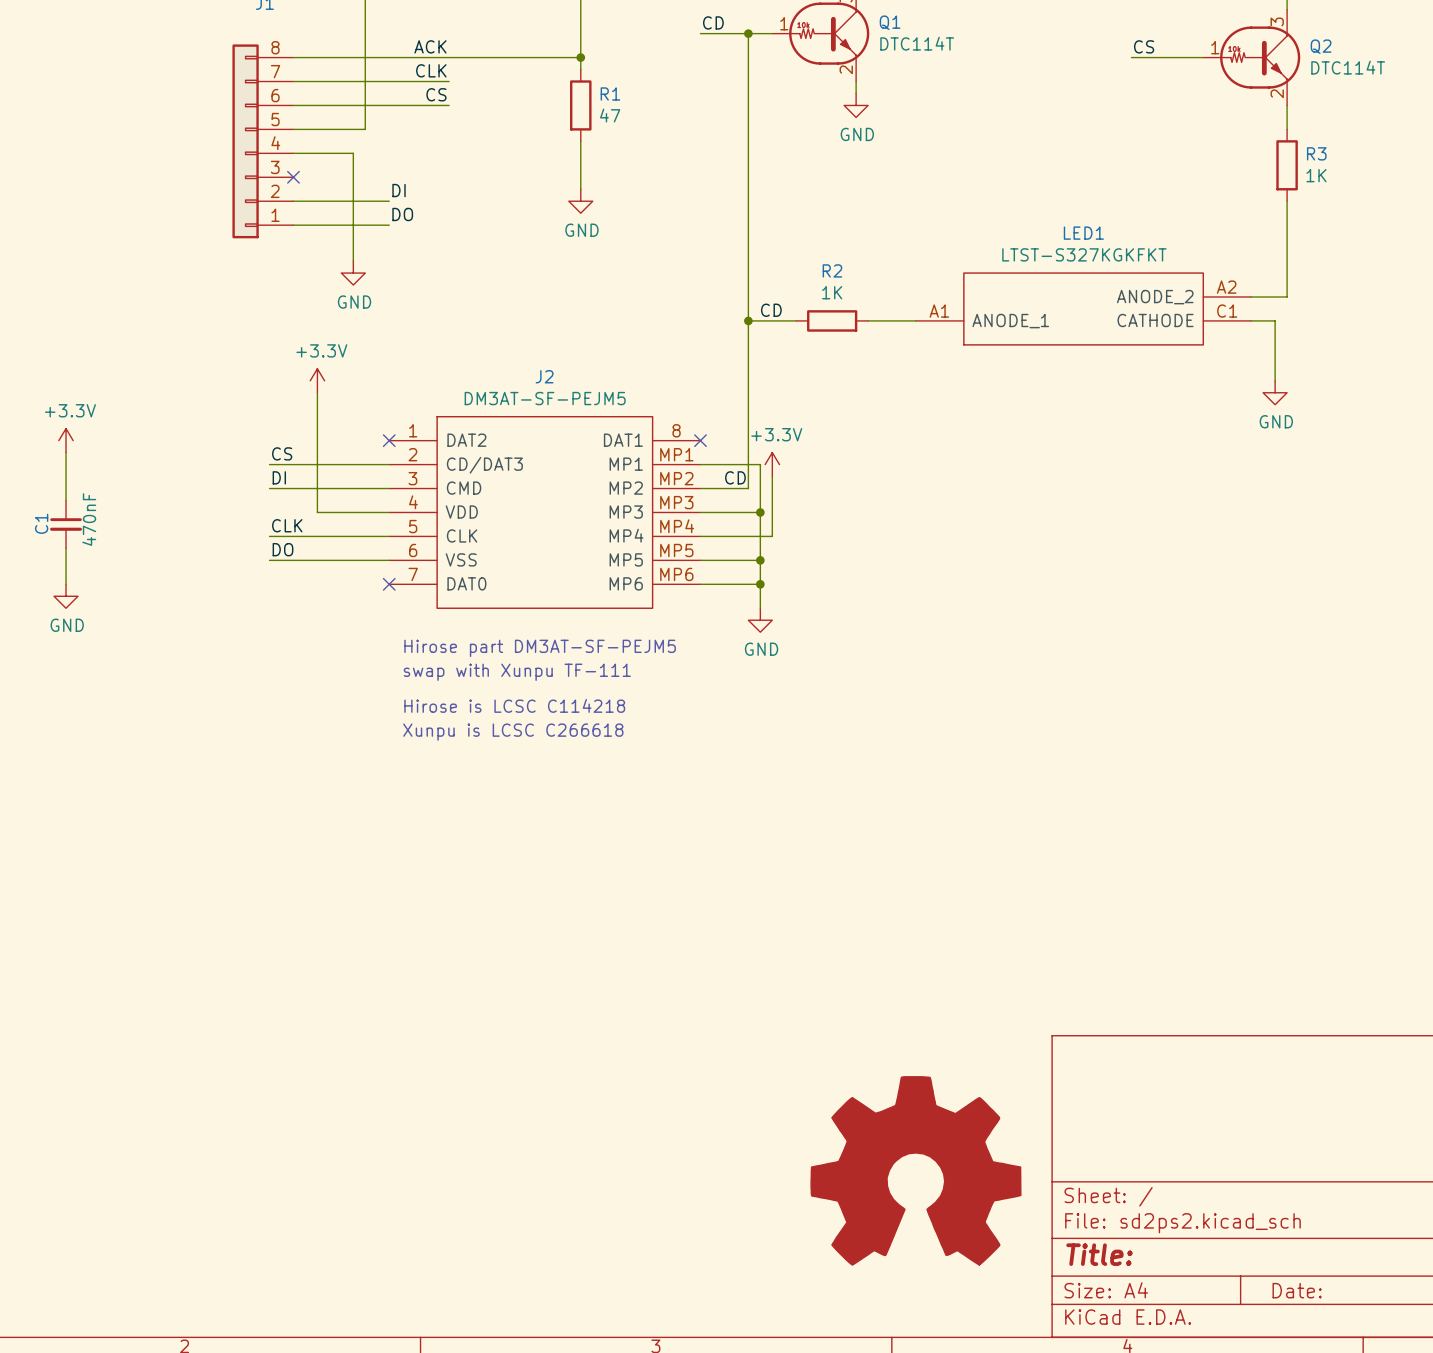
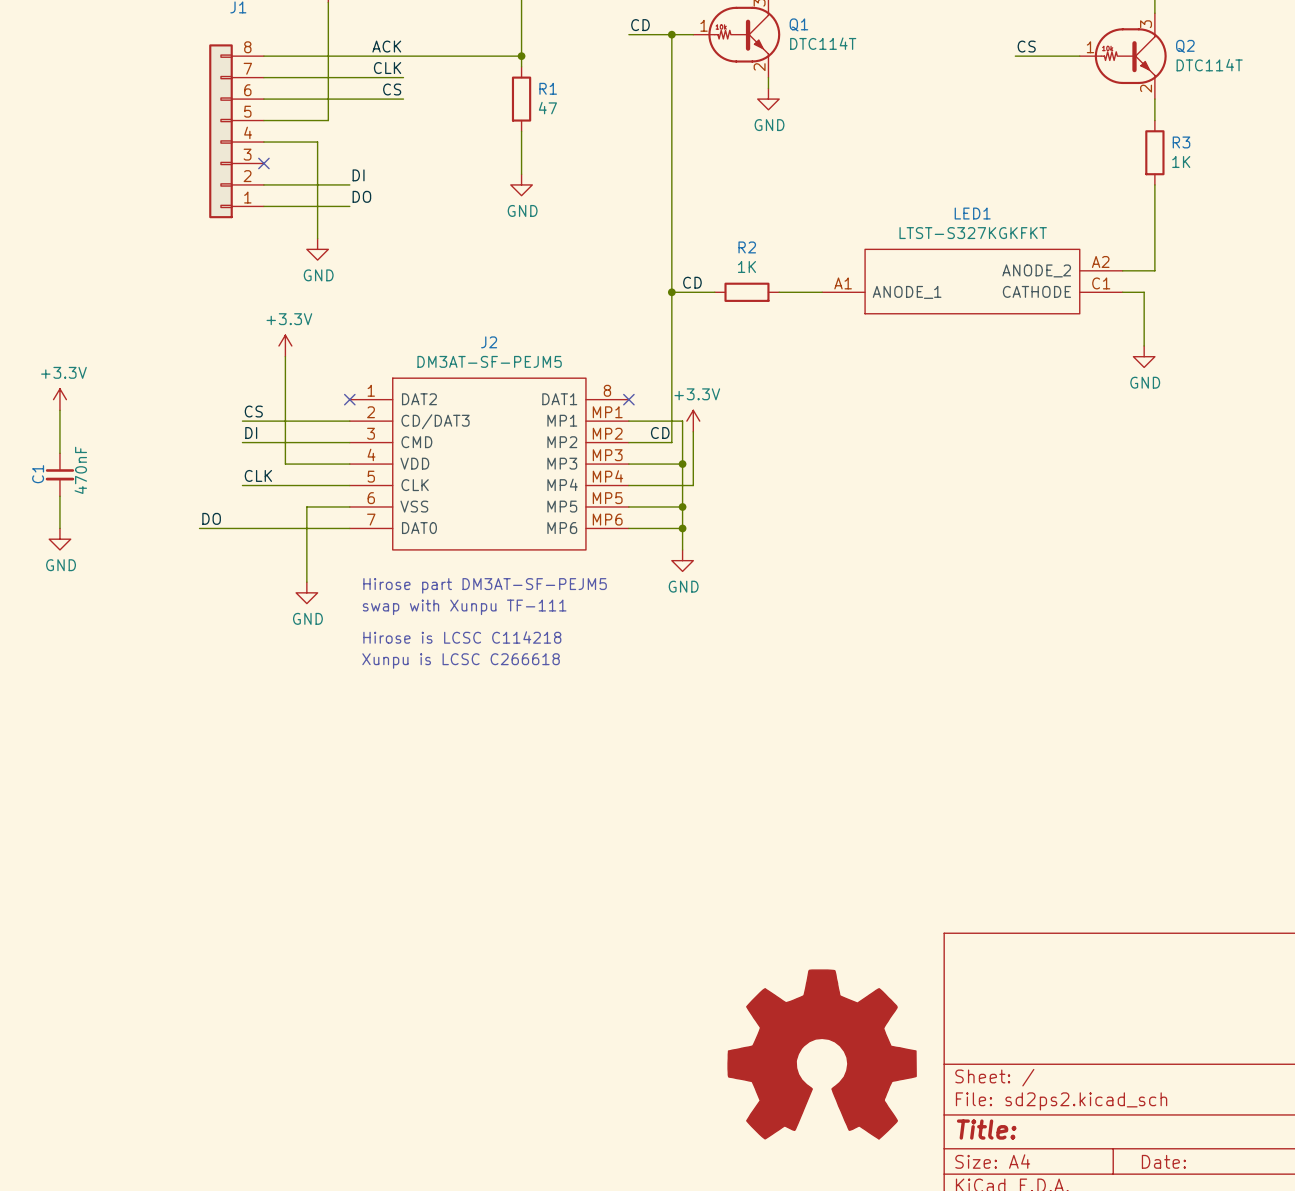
label position: DO (283, 549) -> DO (211, 518)
wire: (269, 560) (341, 560) -> (306, 582) (306, 506)
wire: none -> (199, 528) (349, 528)
no-connect mark: (389, 584) -> none
power symbol: none -> GND (306, 592)

